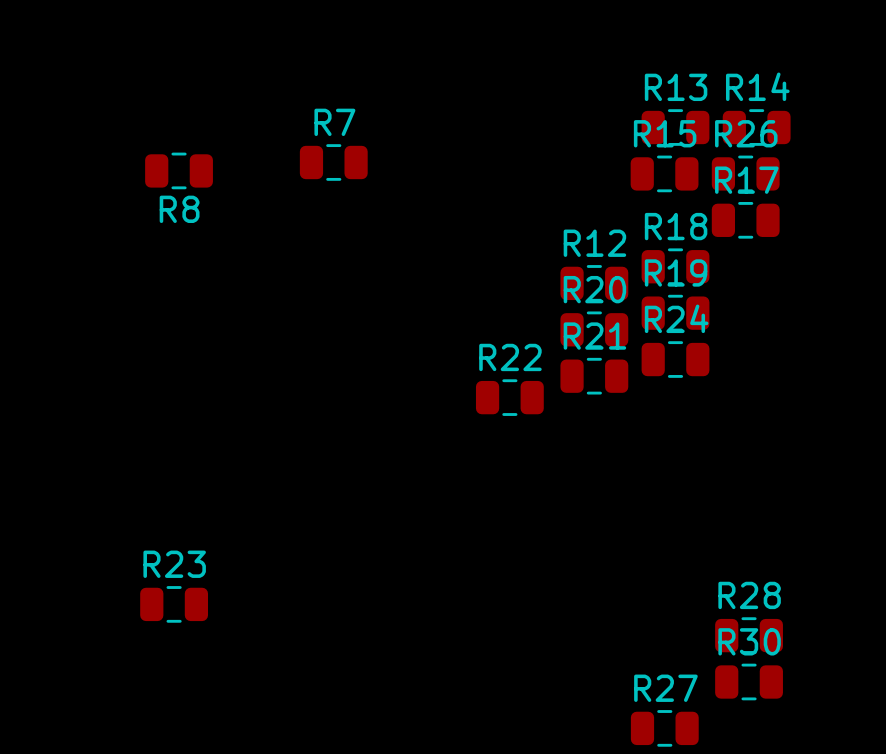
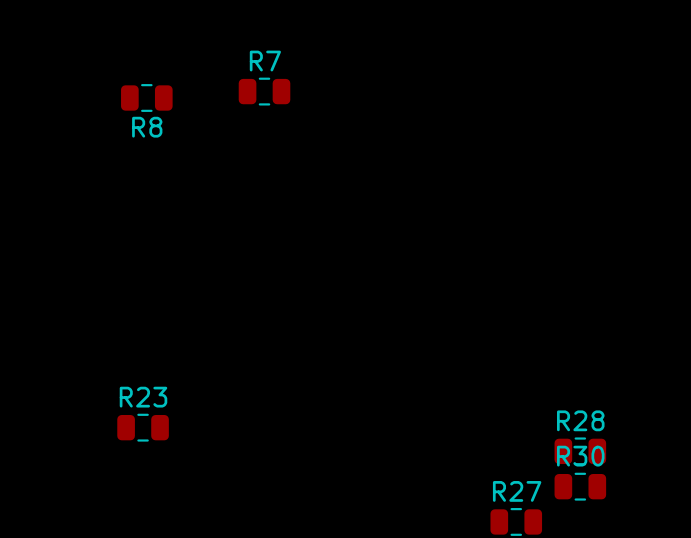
R13: (675, 127) -> none
R14: (756, 127) -> none
R15: (664, 173) -> none
R26: (745, 173) -> none
R17: (745, 220) -> none
R18: (675, 266) -> none
R12: (594, 283) -> none
R19: (675, 313) -> none
R20: (594, 329) -> none
R24: (675, 359) -> none
R21: (594, 376) -> none
R22: (509, 397) -> none

